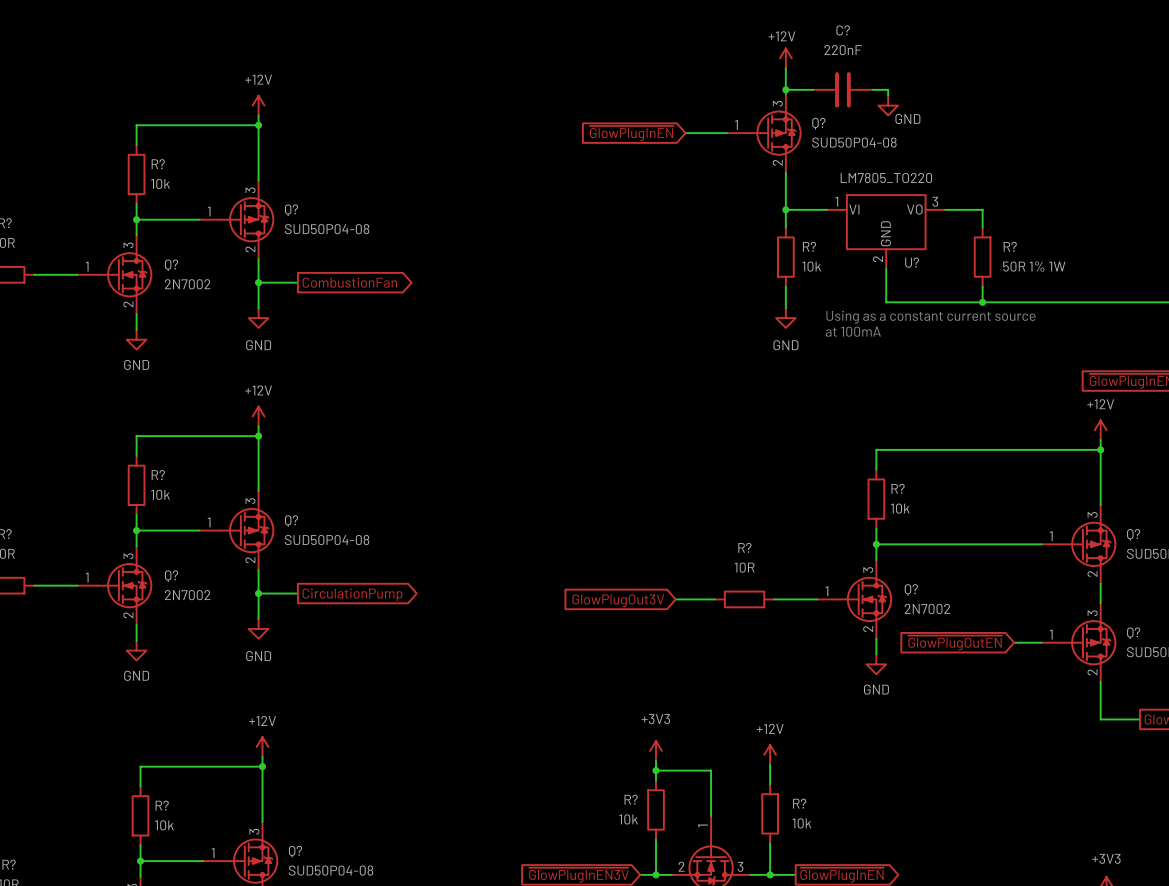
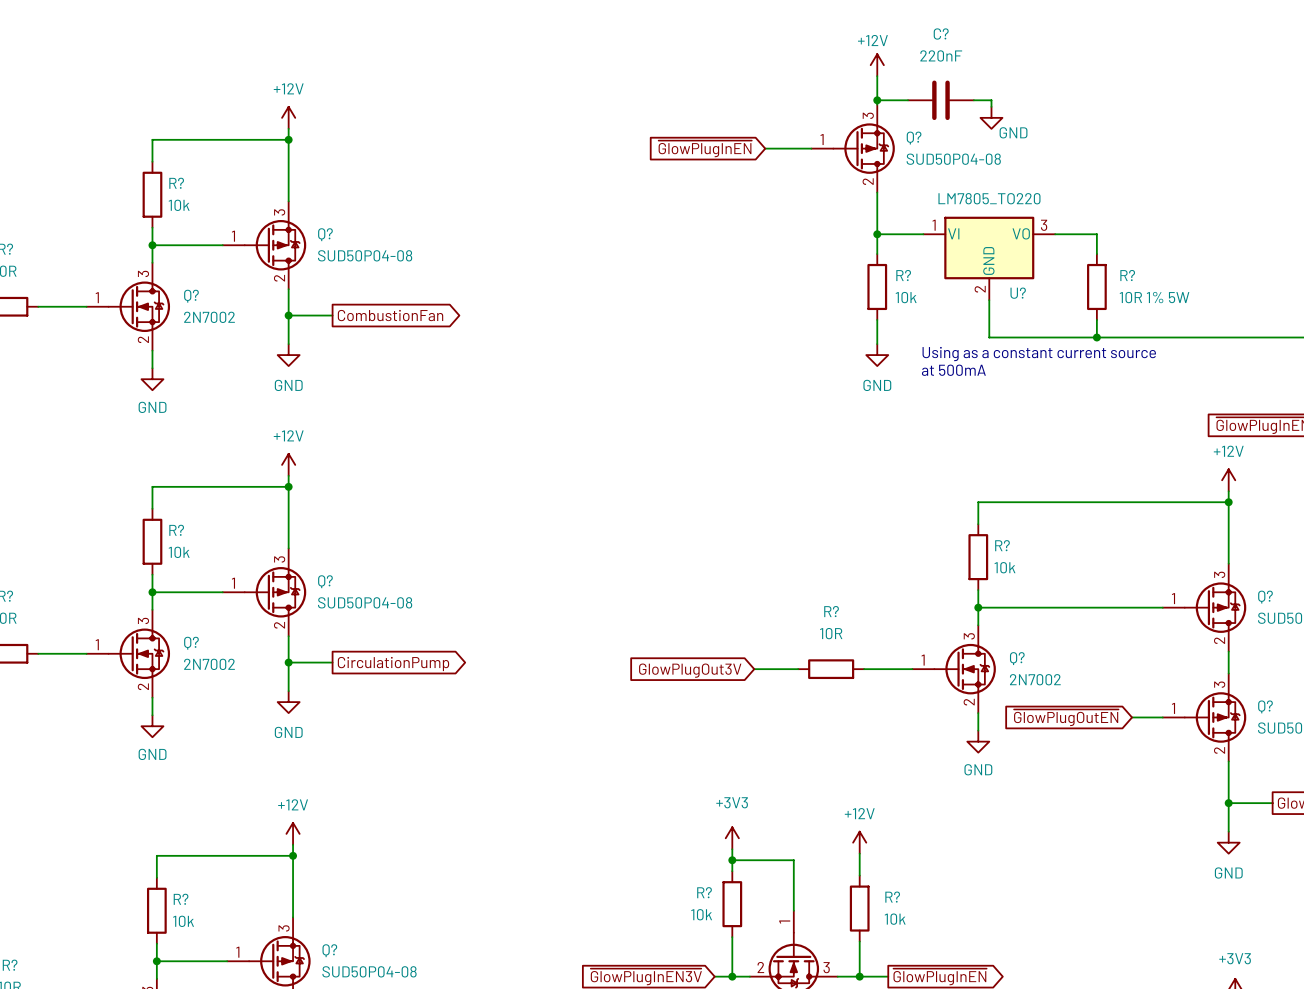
R? value: 50R 1% 1W (1034, 266) -> 10R 1% 5W (1154, 297)
text: at 100mA (853, 331) -> at 500mA (953, 370)
wire: none -> (1228, 803) (1228, 831)
junction: none -> (1228, 803)
power symbol: none -> GND (1228, 842)

